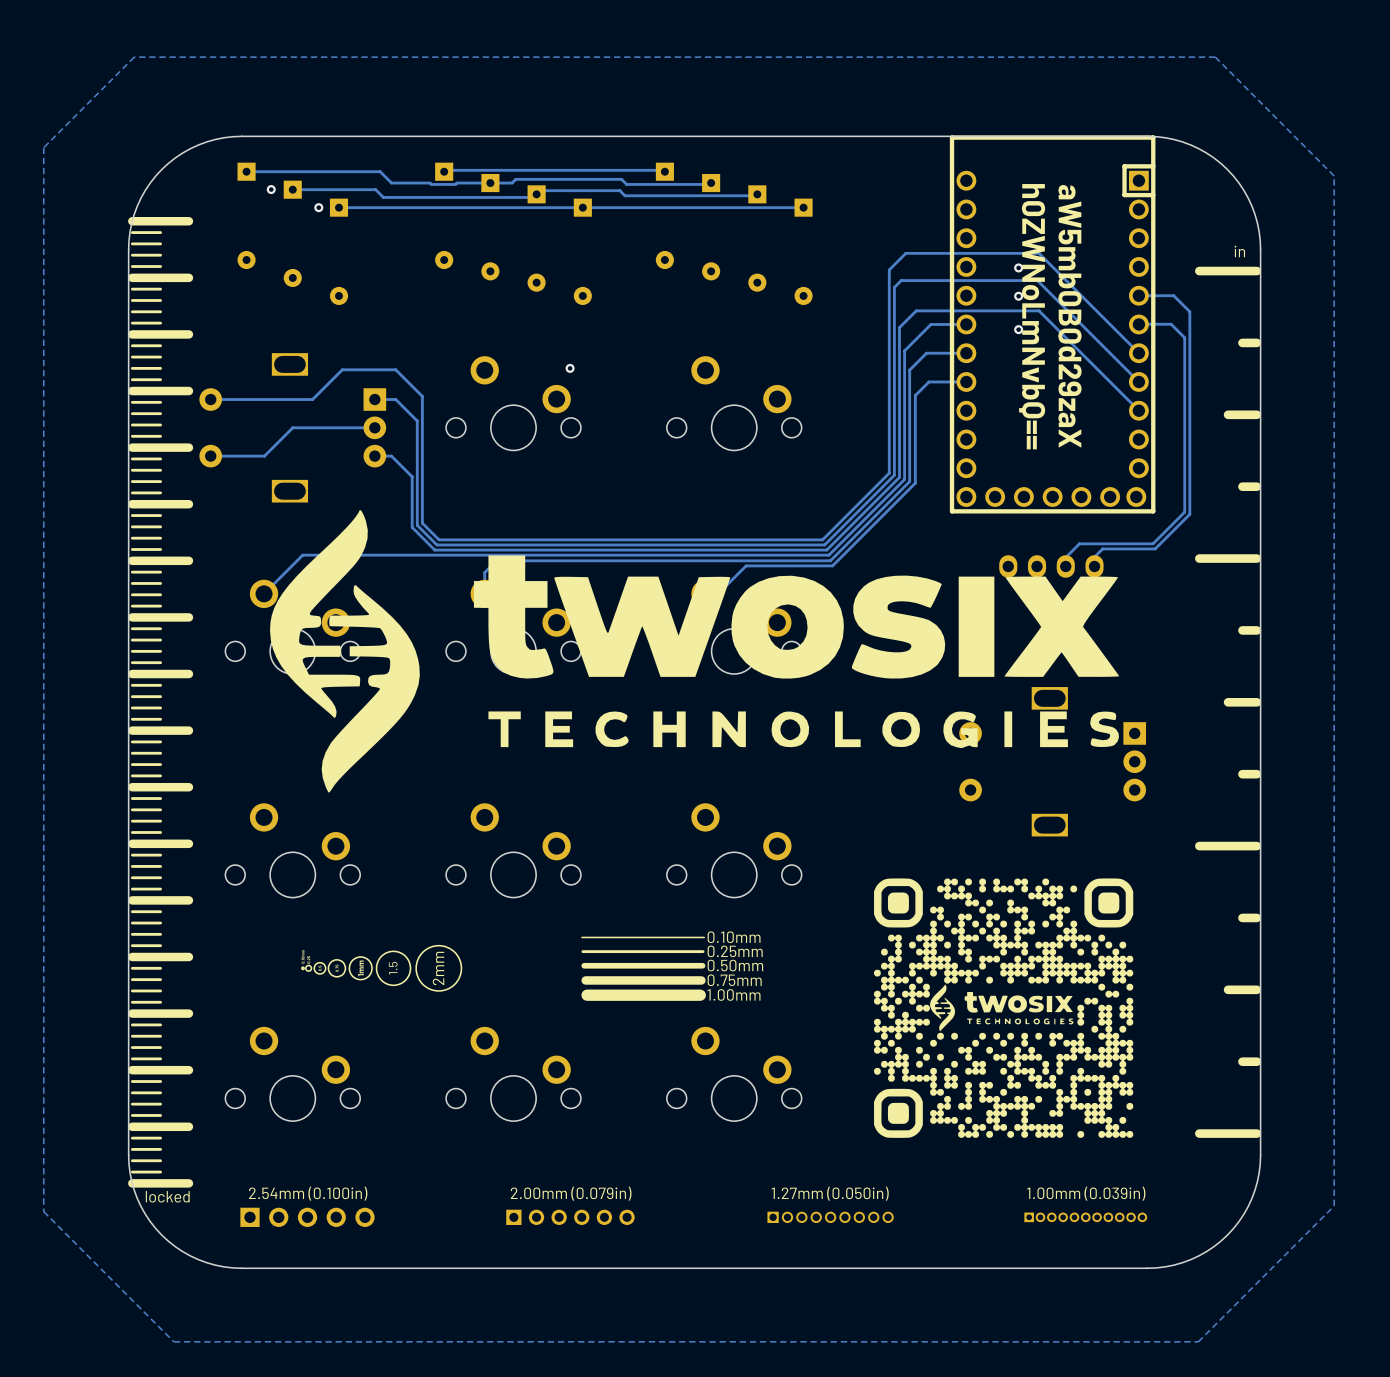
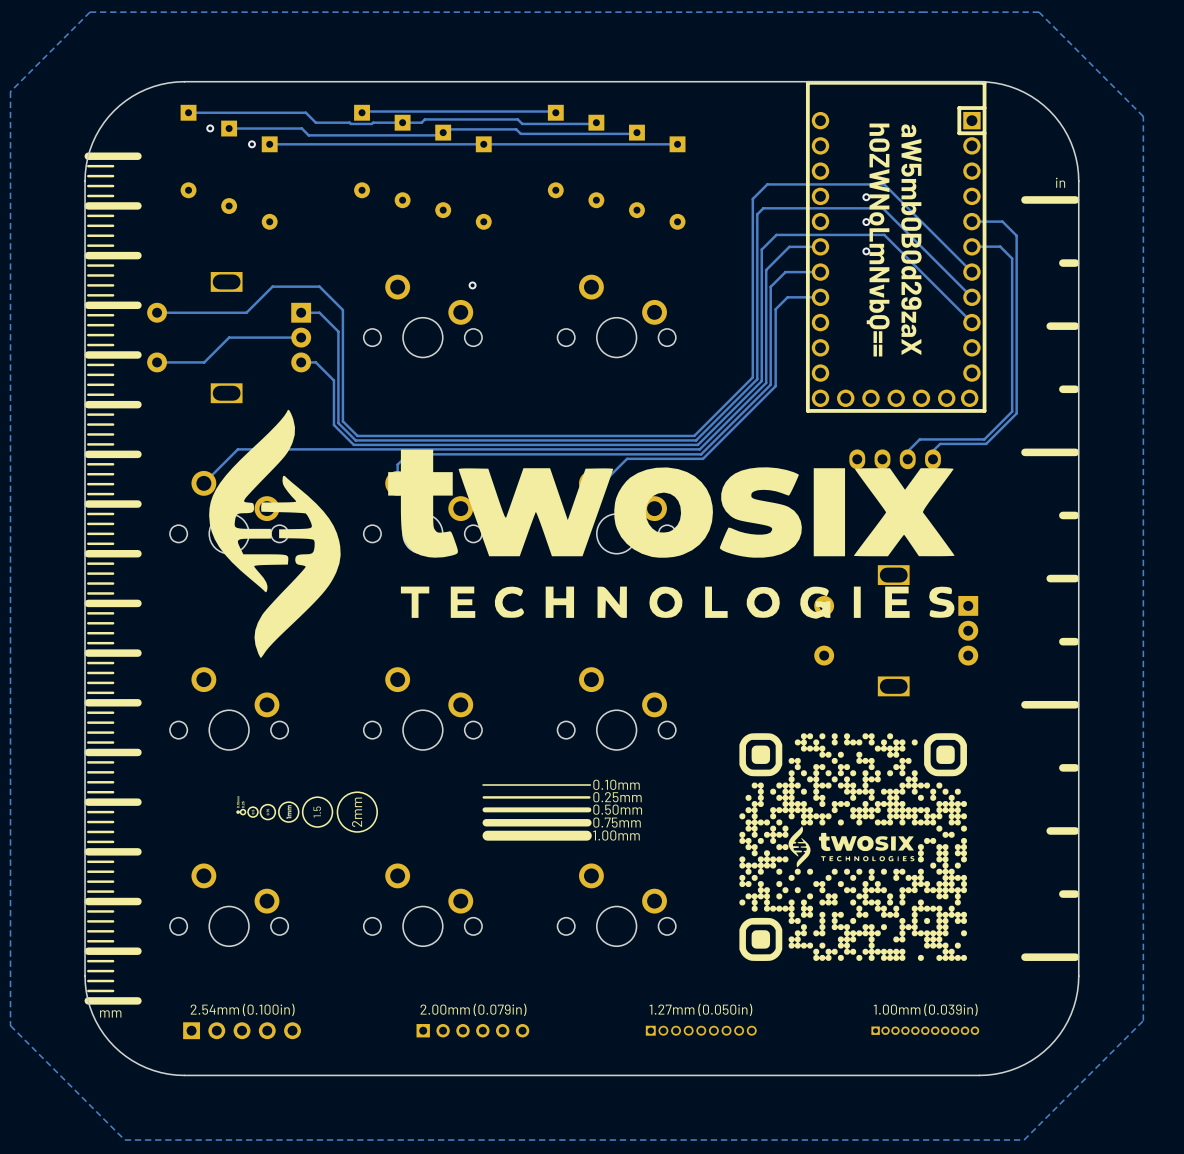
text: locked (167, 1196) -> mm (110, 1013)

